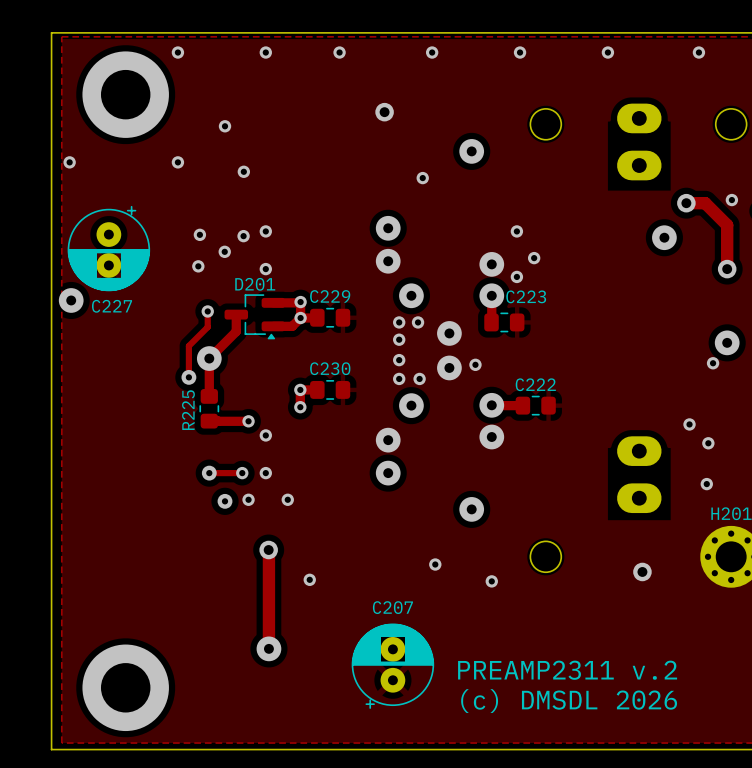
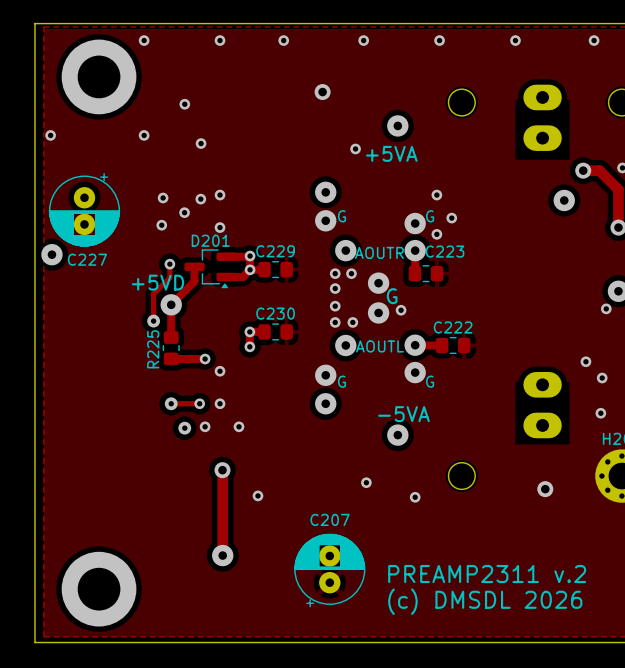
text: none -> +5VA (391, 153)
text: none -> G (341, 216)
text: none -> G (430, 216)
text: none -> AOUTR (379, 252)
text: none -> +5VD (158, 282)
text: none -> G (392, 296)
text: none -> AOUTL (379, 346)
text: none -> G (341, 381)
text: none -> G (430, 381)
text: none -> -5VA (403, 414)

